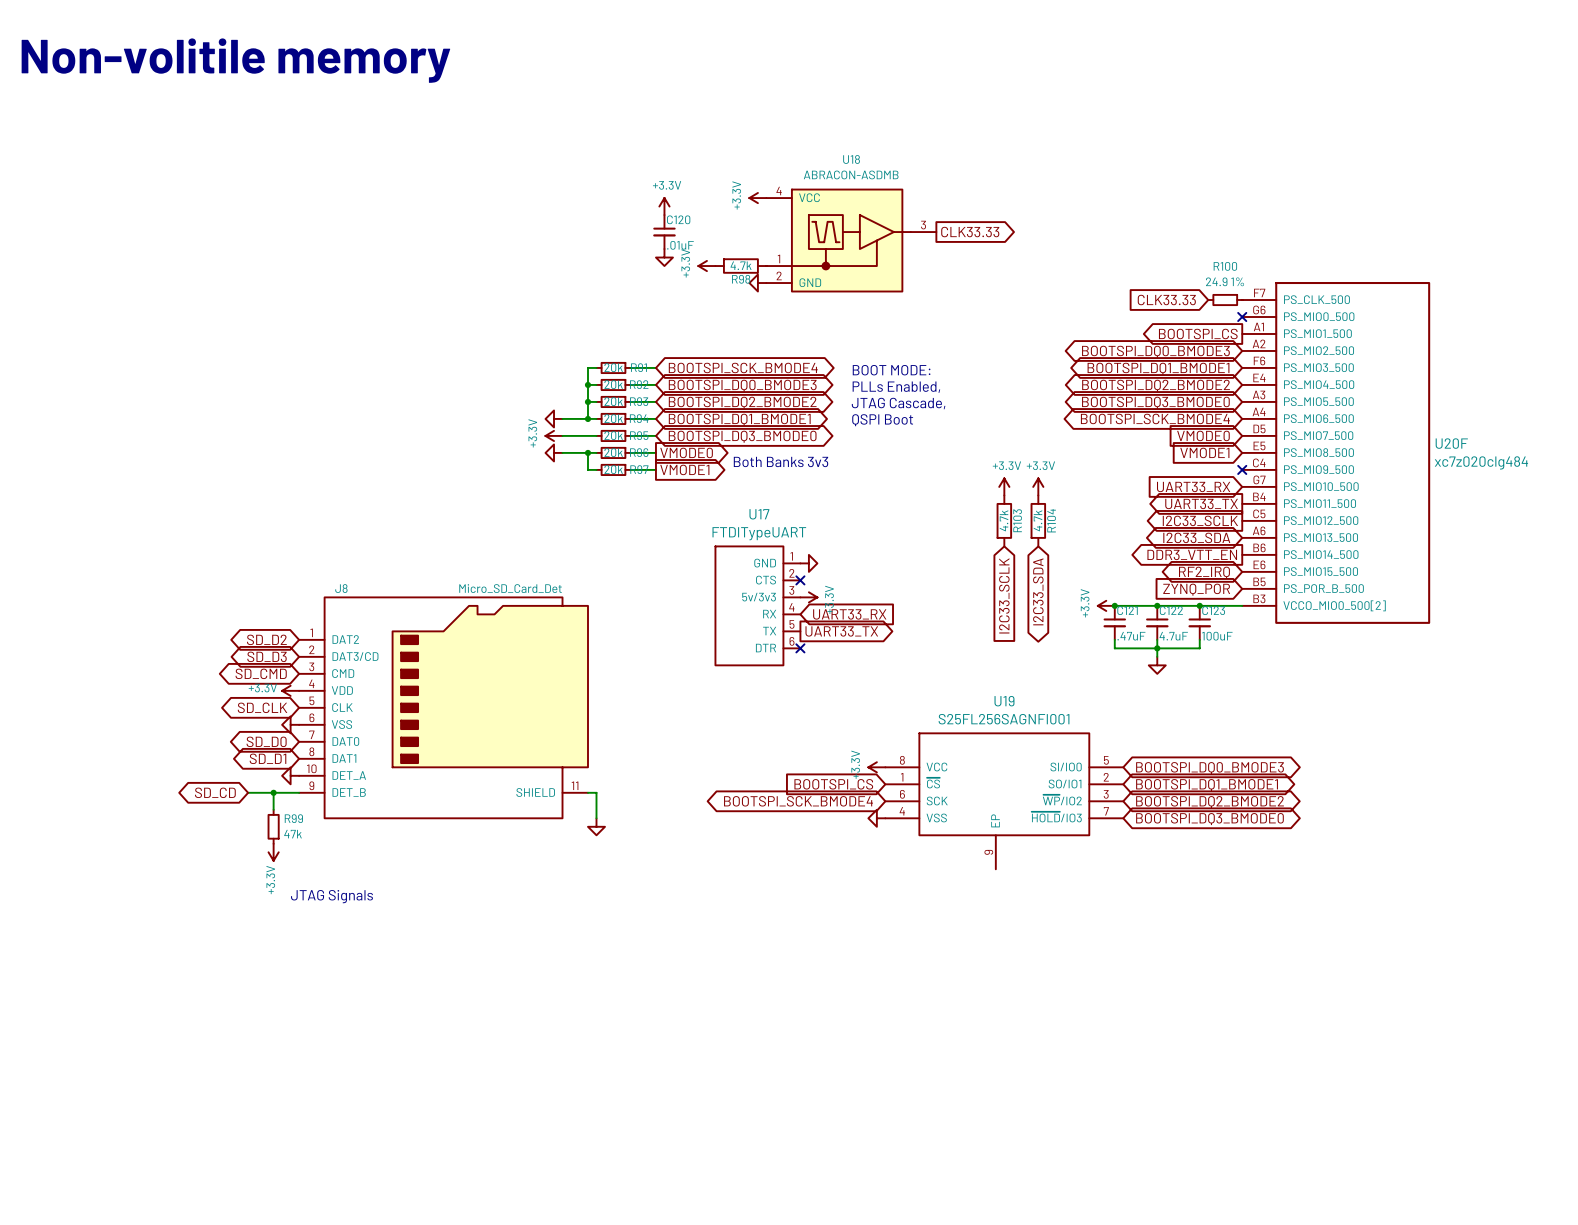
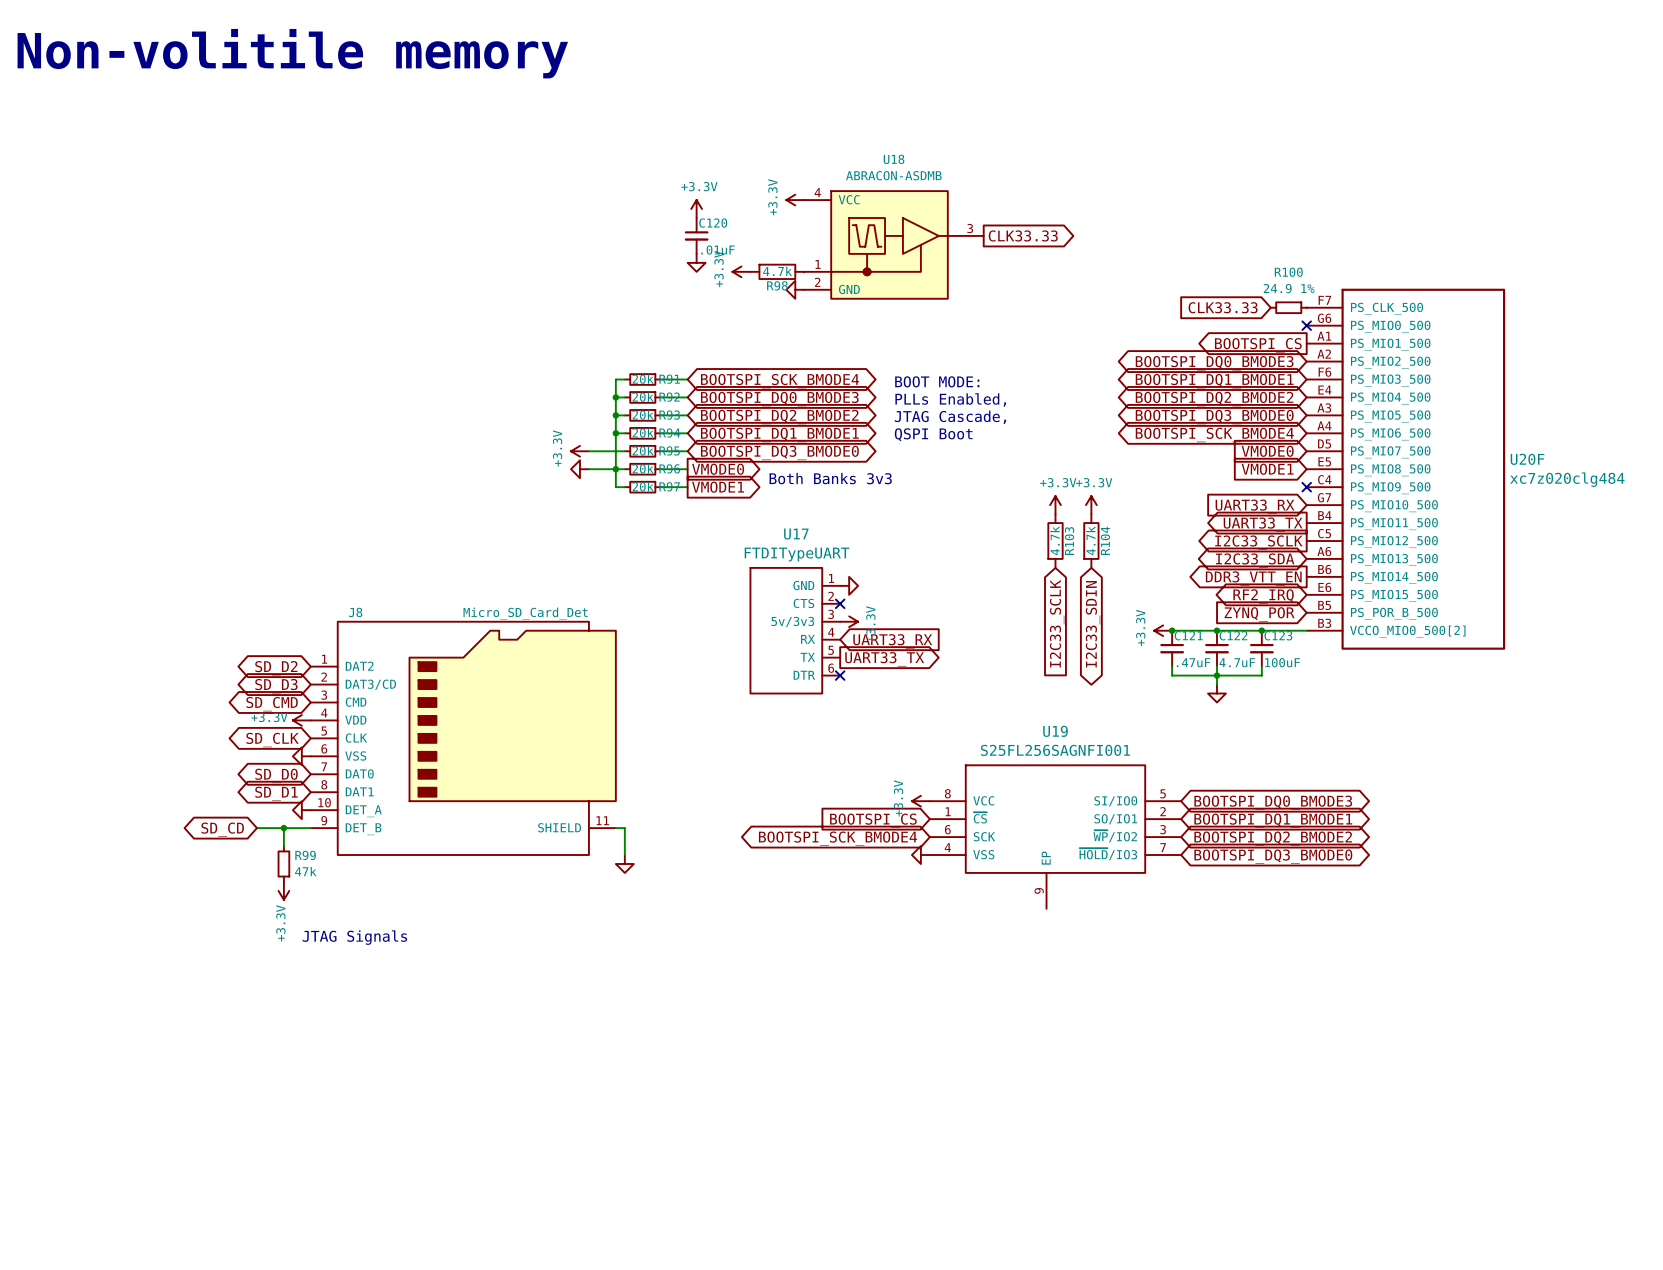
power symbol: (554, 418) -> none
wire: (562, 418) (587, 418) -> (615, 469) (615, 433)
global label: I2C33_SDA (1038, 591) -> I2C33_SDIN (1093, 624)

